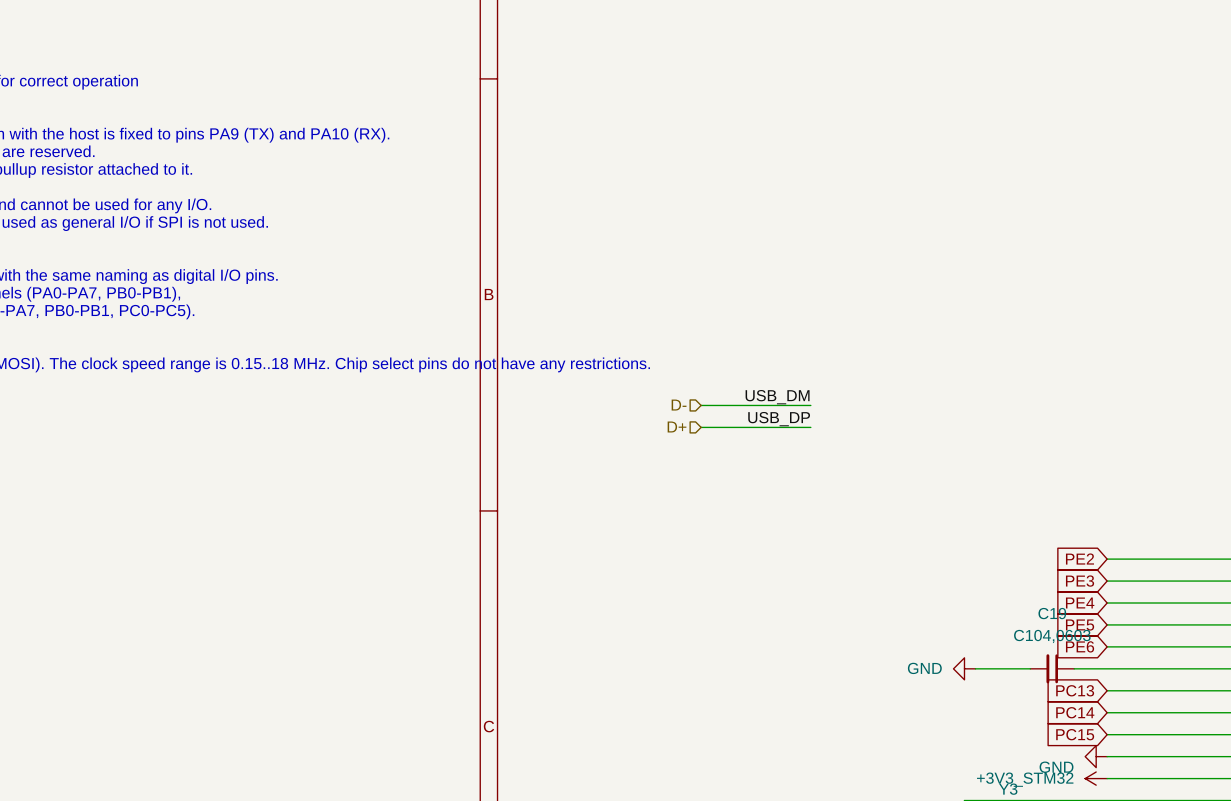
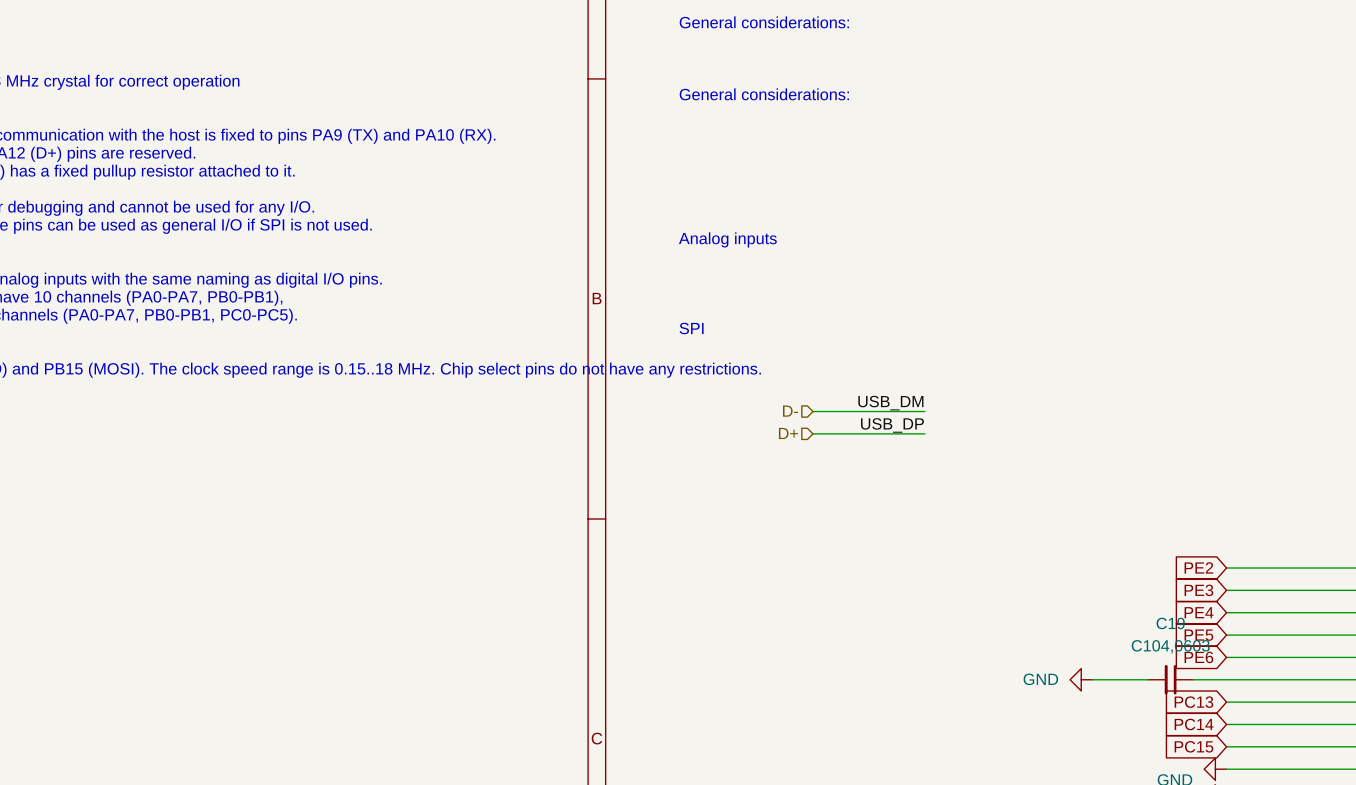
text: none -> General considerations: (764, 22)
text: none -> General considerations: (764, 94)
text: none -> Analog inputs (727, 239)
text: none -> SPI (691, 328)

